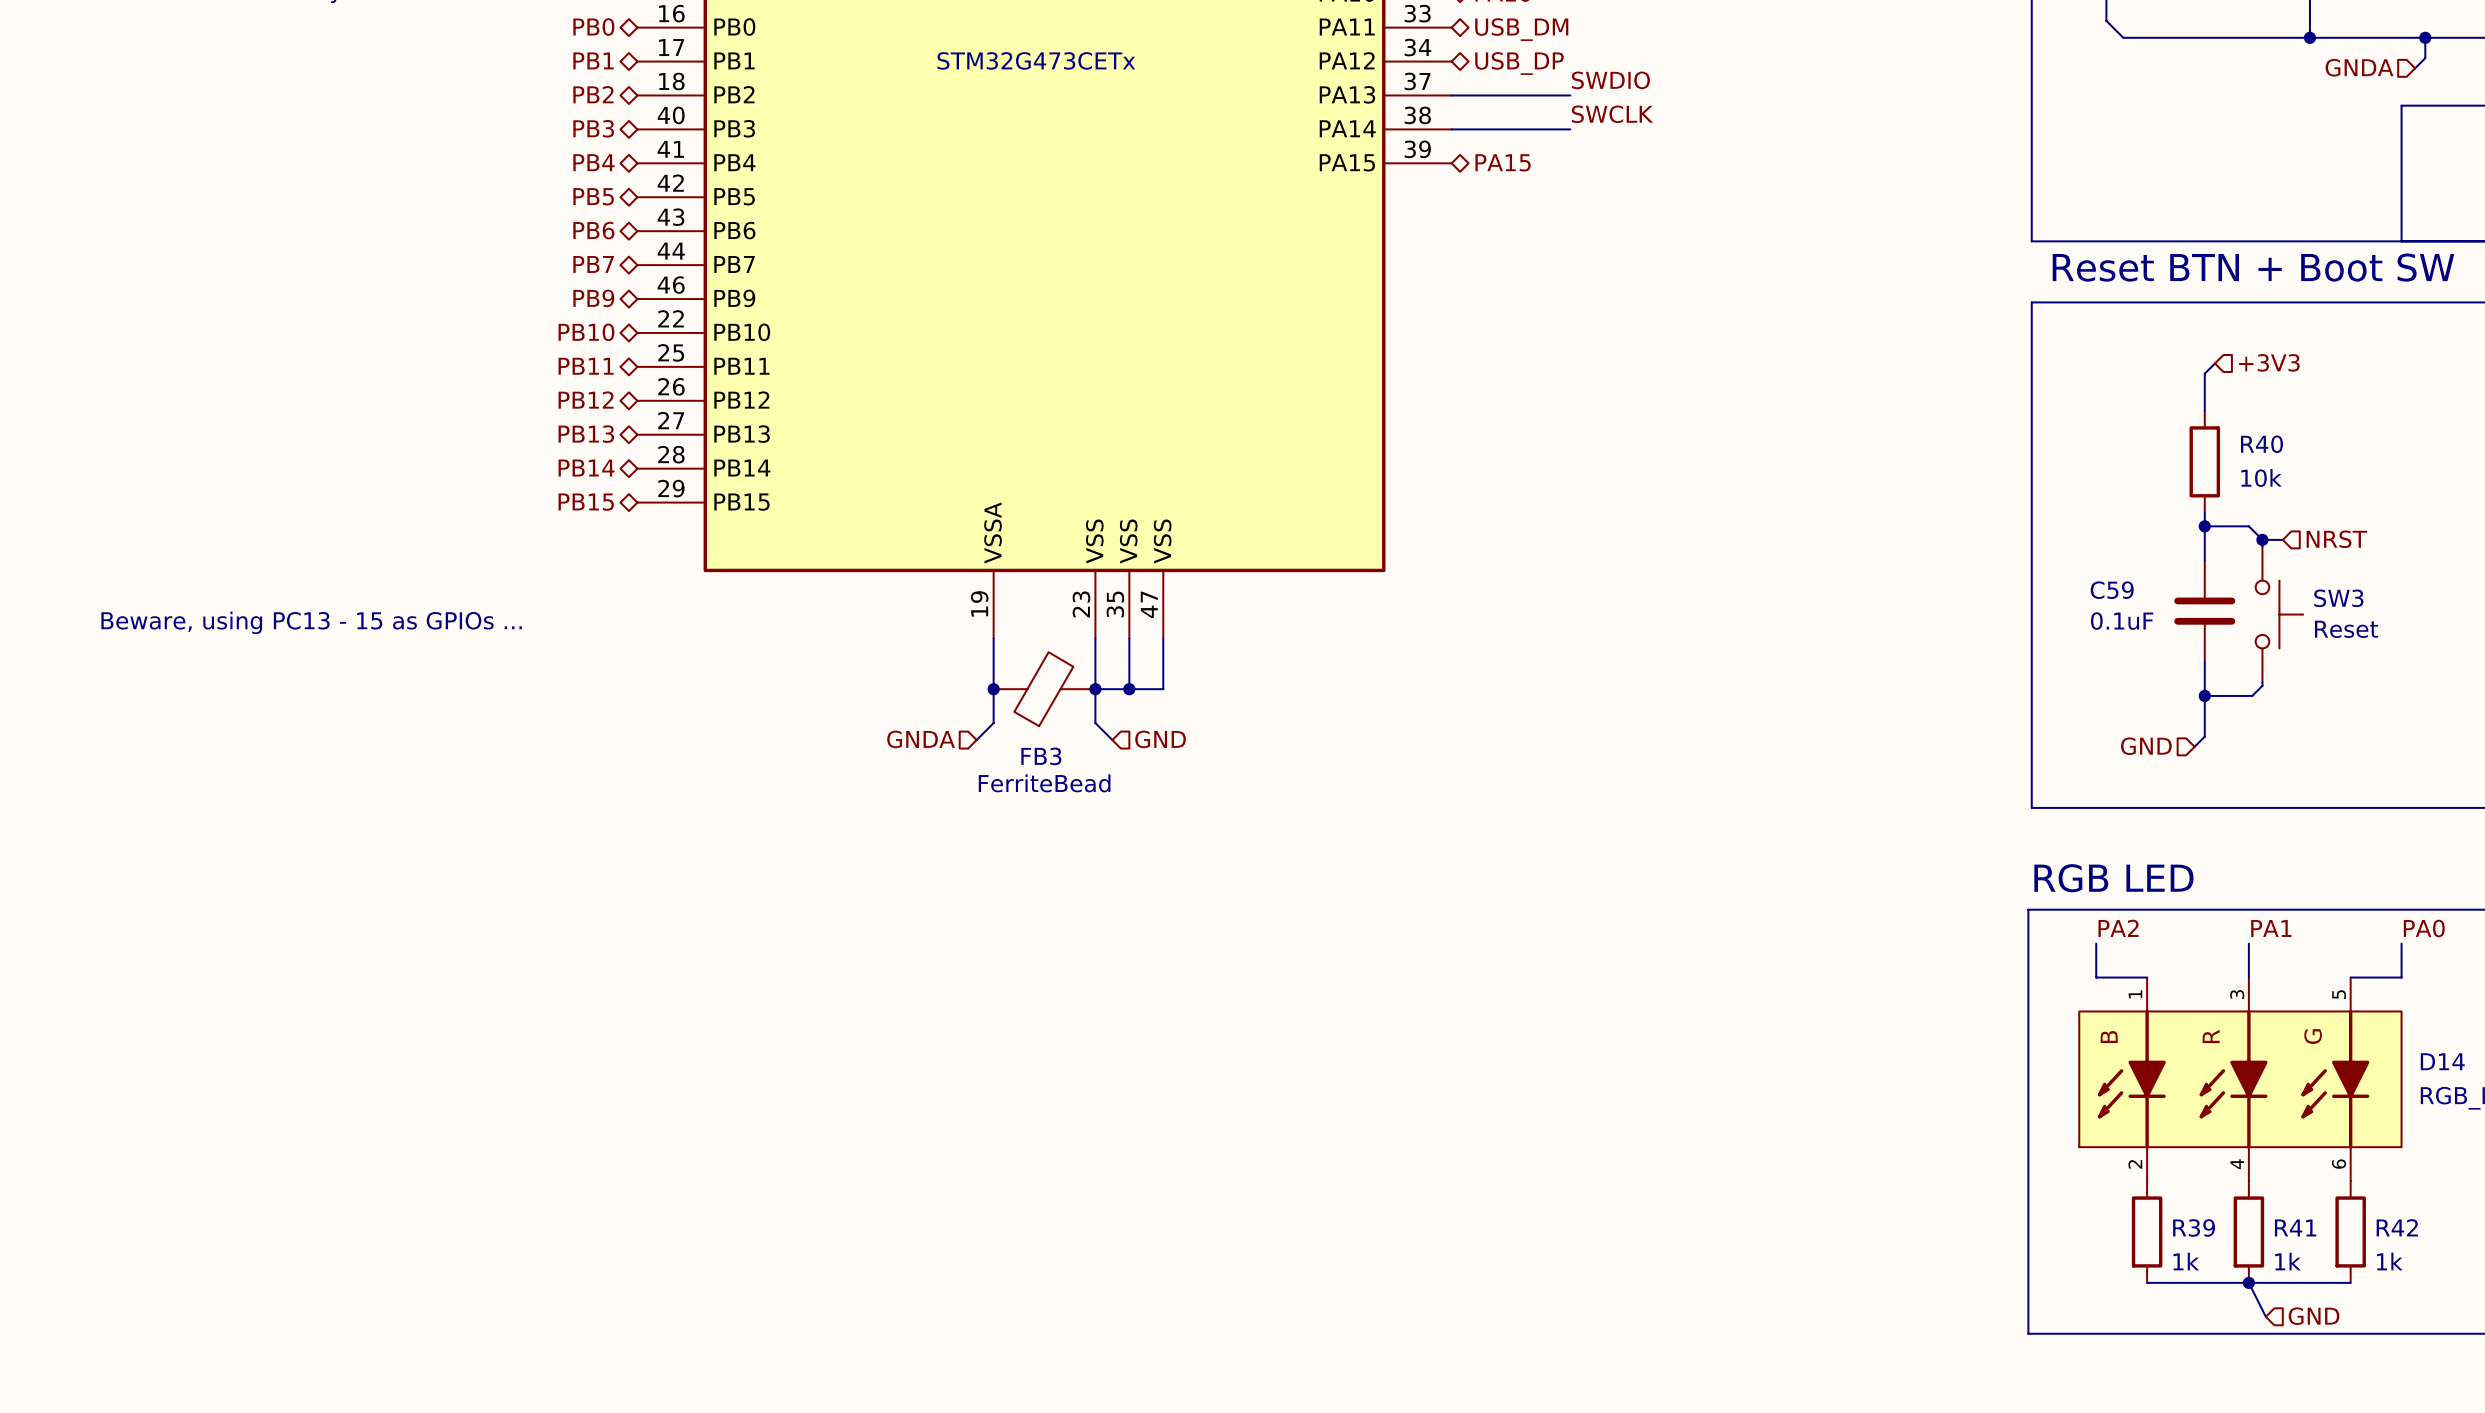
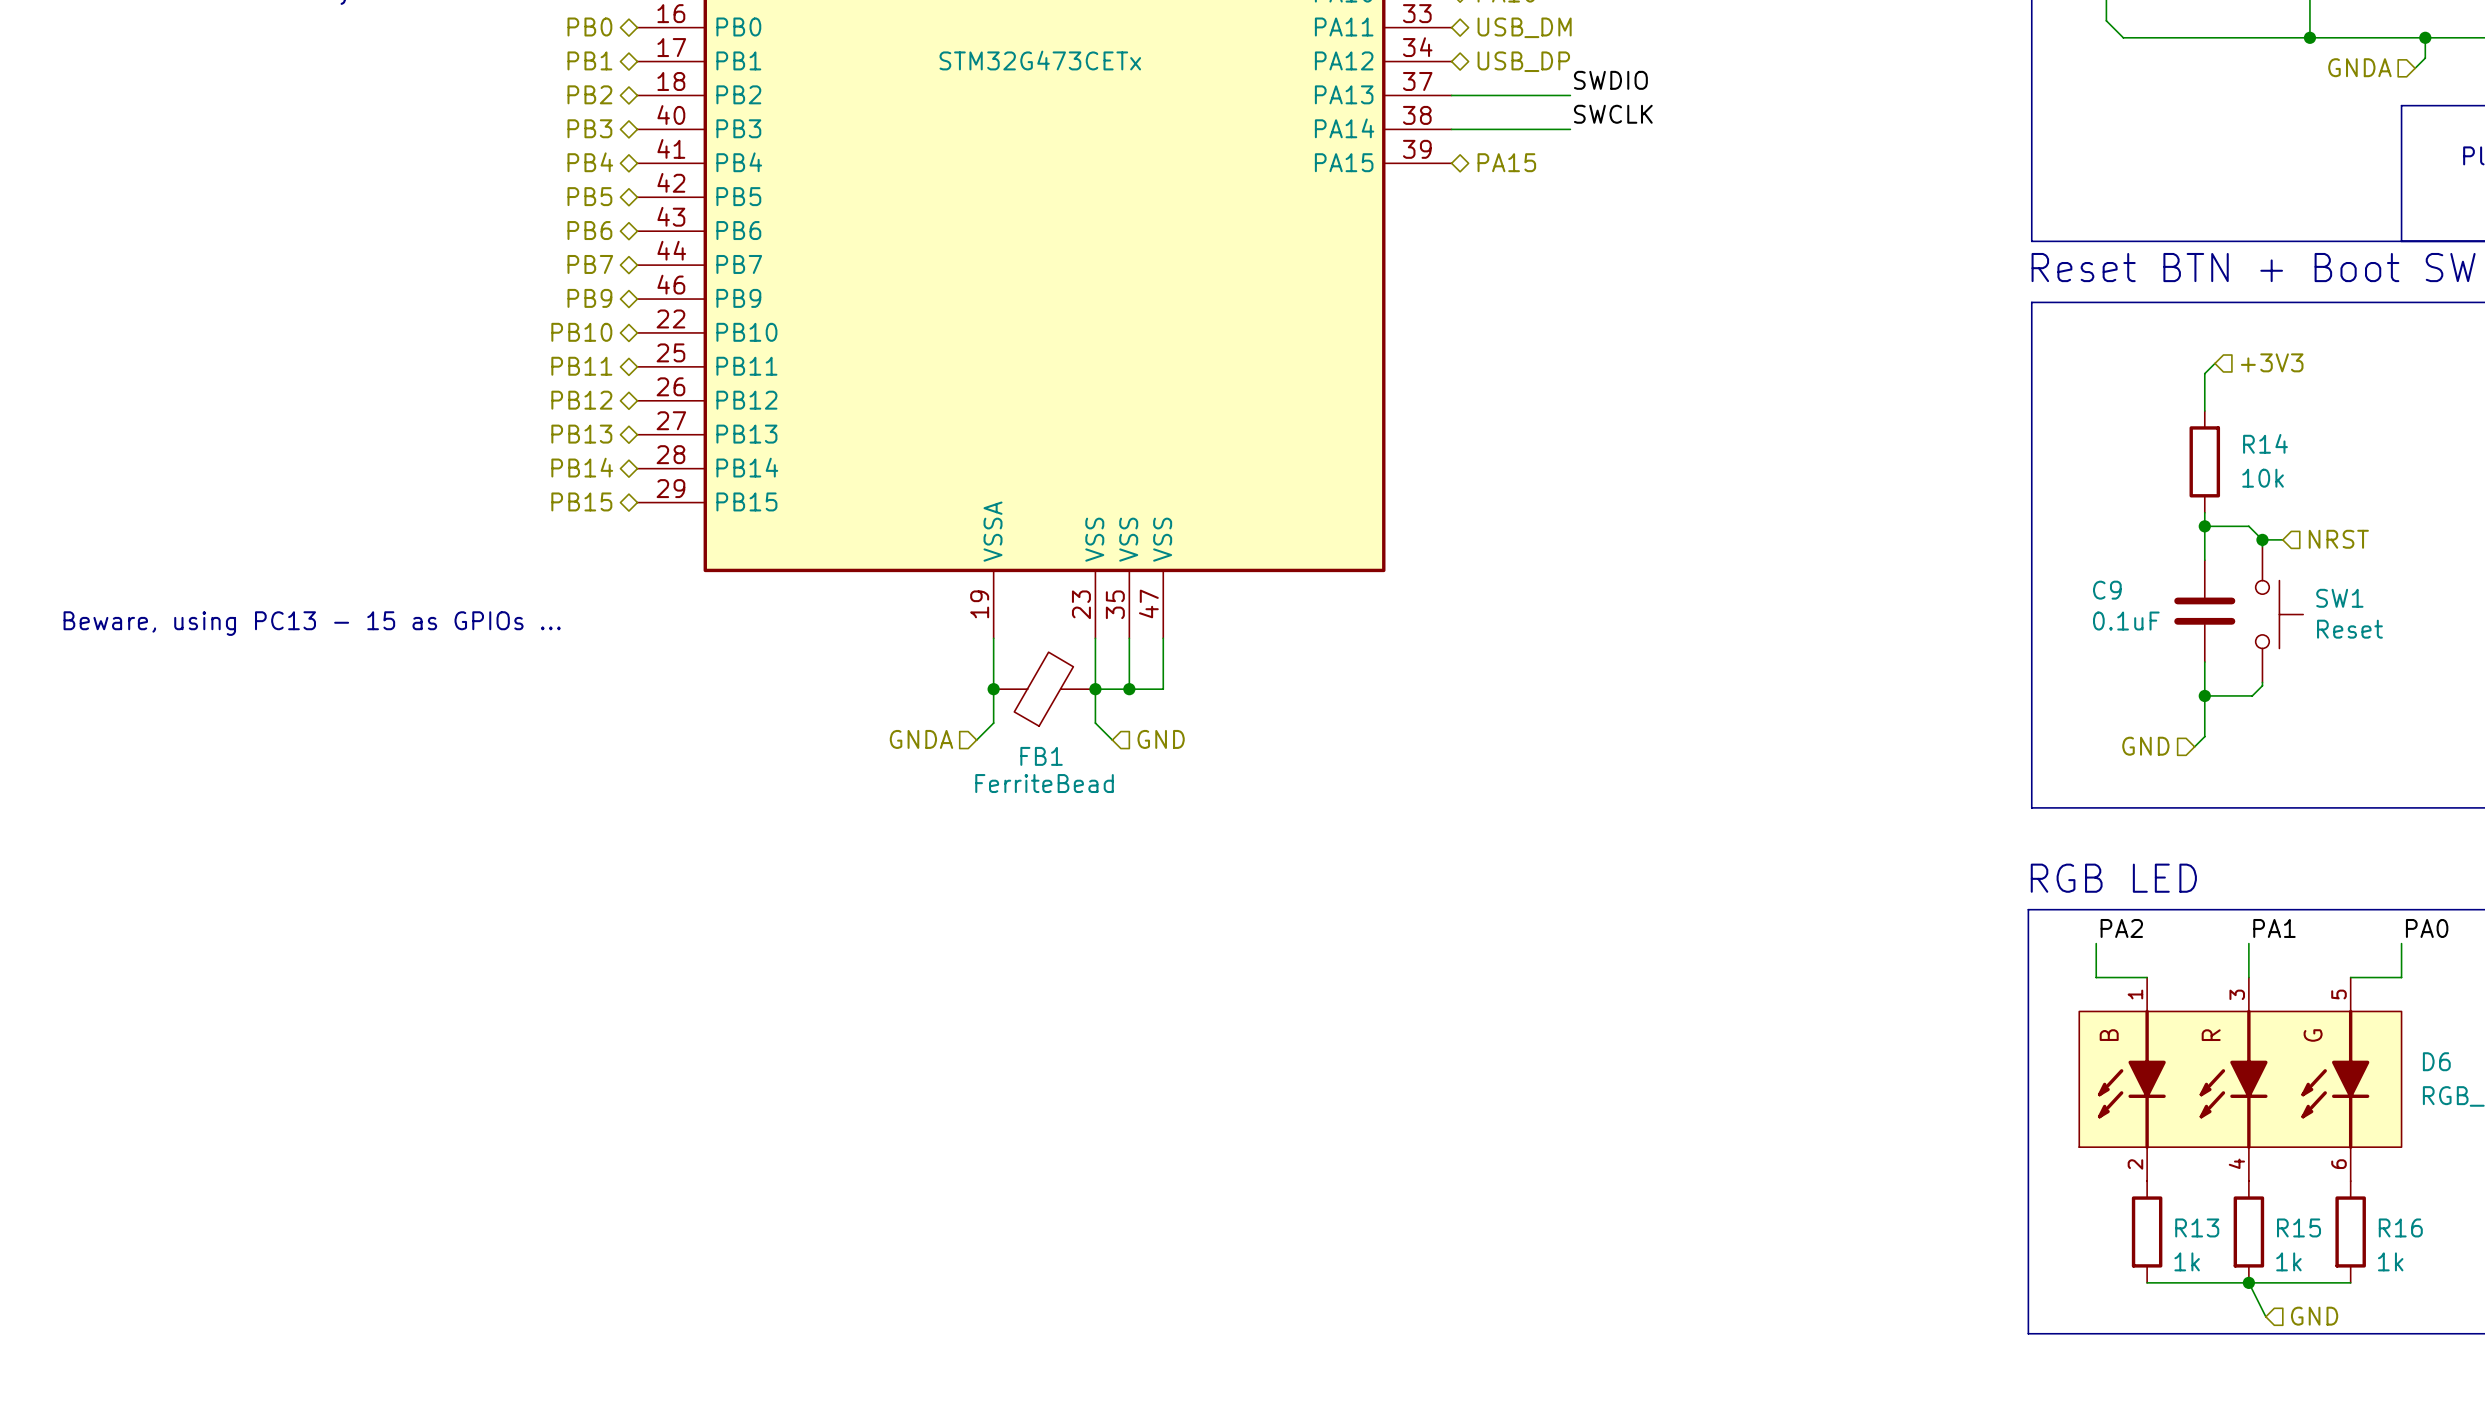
R40 name: R40 (2261, 444) -> R14 (2265, 443)
C59 name: C59 (2112, 590) -> C9 (2107, 590)
SW3 name: SW3 (2338, 598) -> SW1 (2339, 598)
FB3 name: FB3 (1041, 756) -> FB1 (1041, 756)
D14 name: D14 (2442, 1061) -> D6 (2436, 1061)
R39 name: R39 (2194, 1227) -> R13 (2197, 1227)
R41 name: R41 (2295, 1227) -> R15 (2299, 1227)
R42 name: R42 (2397, 1227) -> R16 (2400, 1227)

